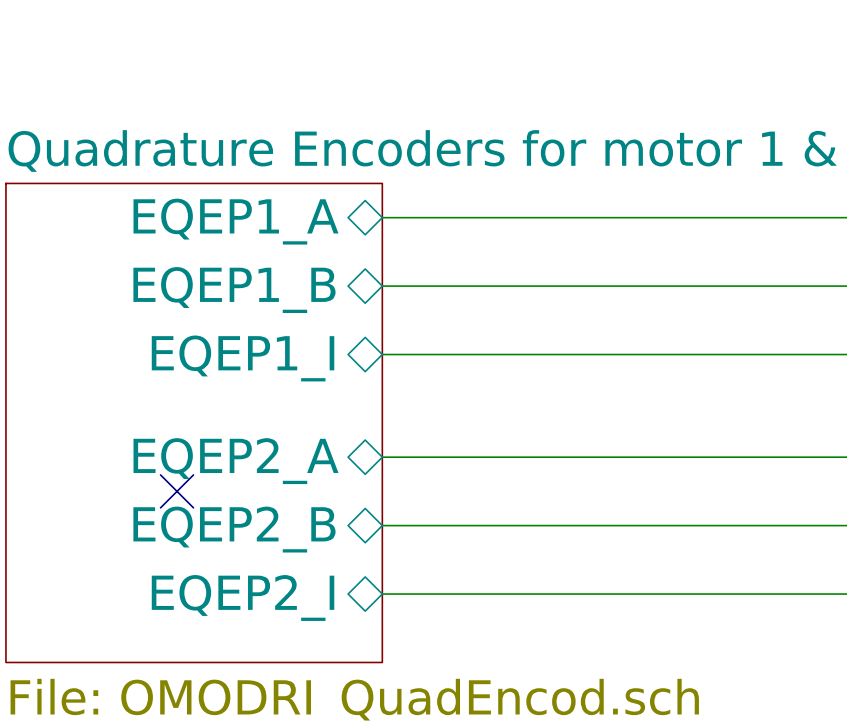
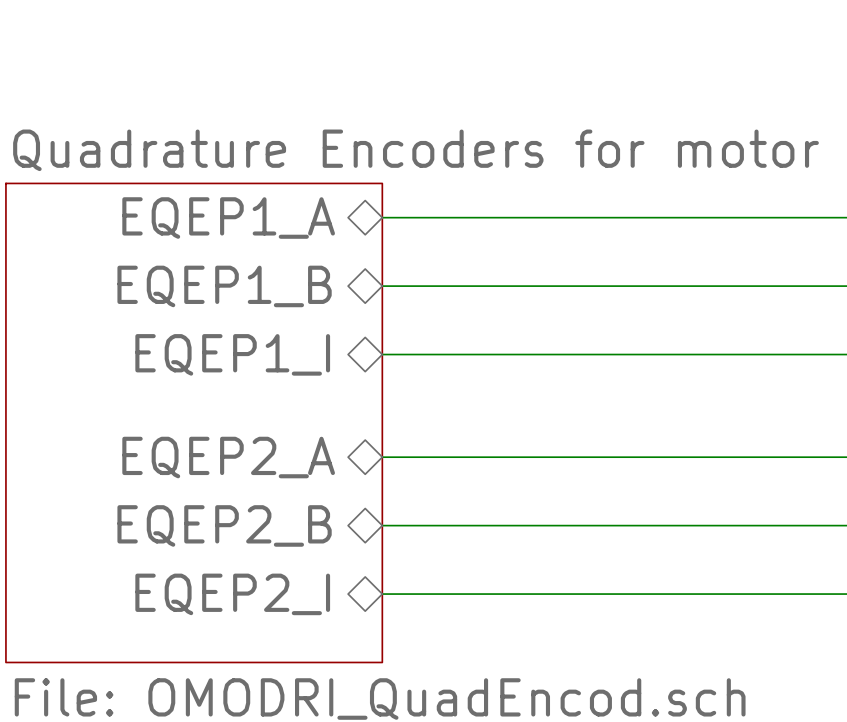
no-connect mark: (177, 491) -> none

